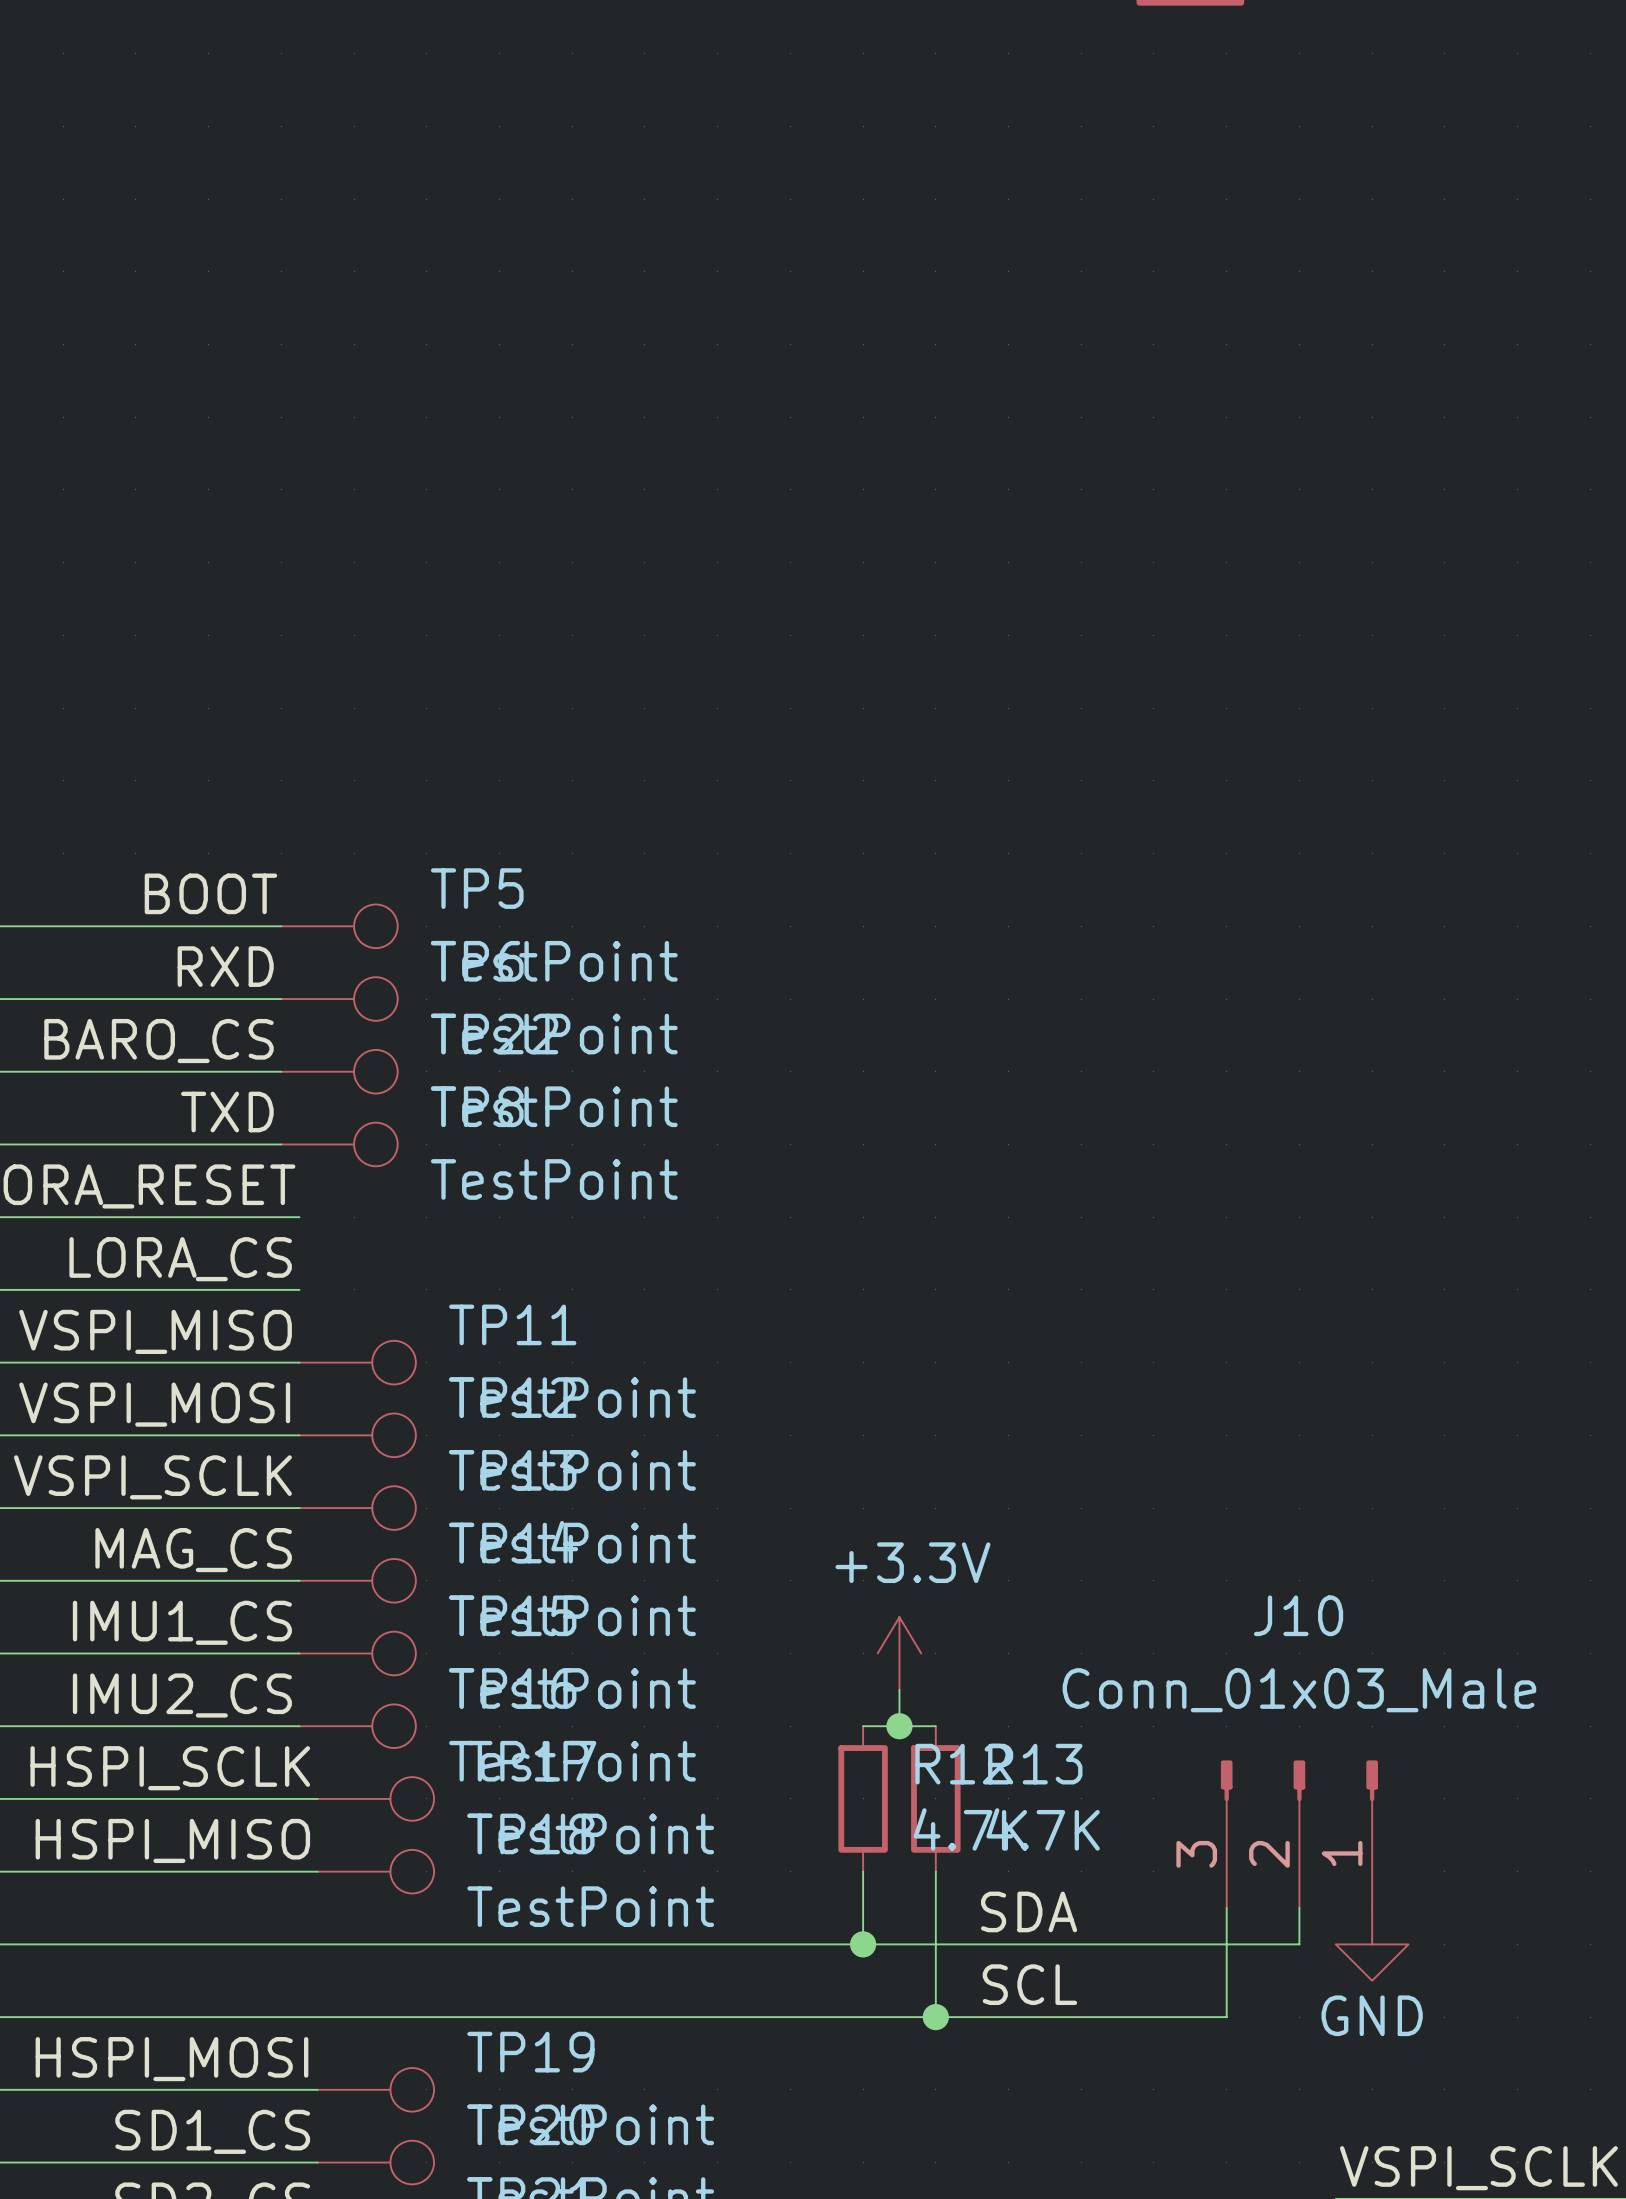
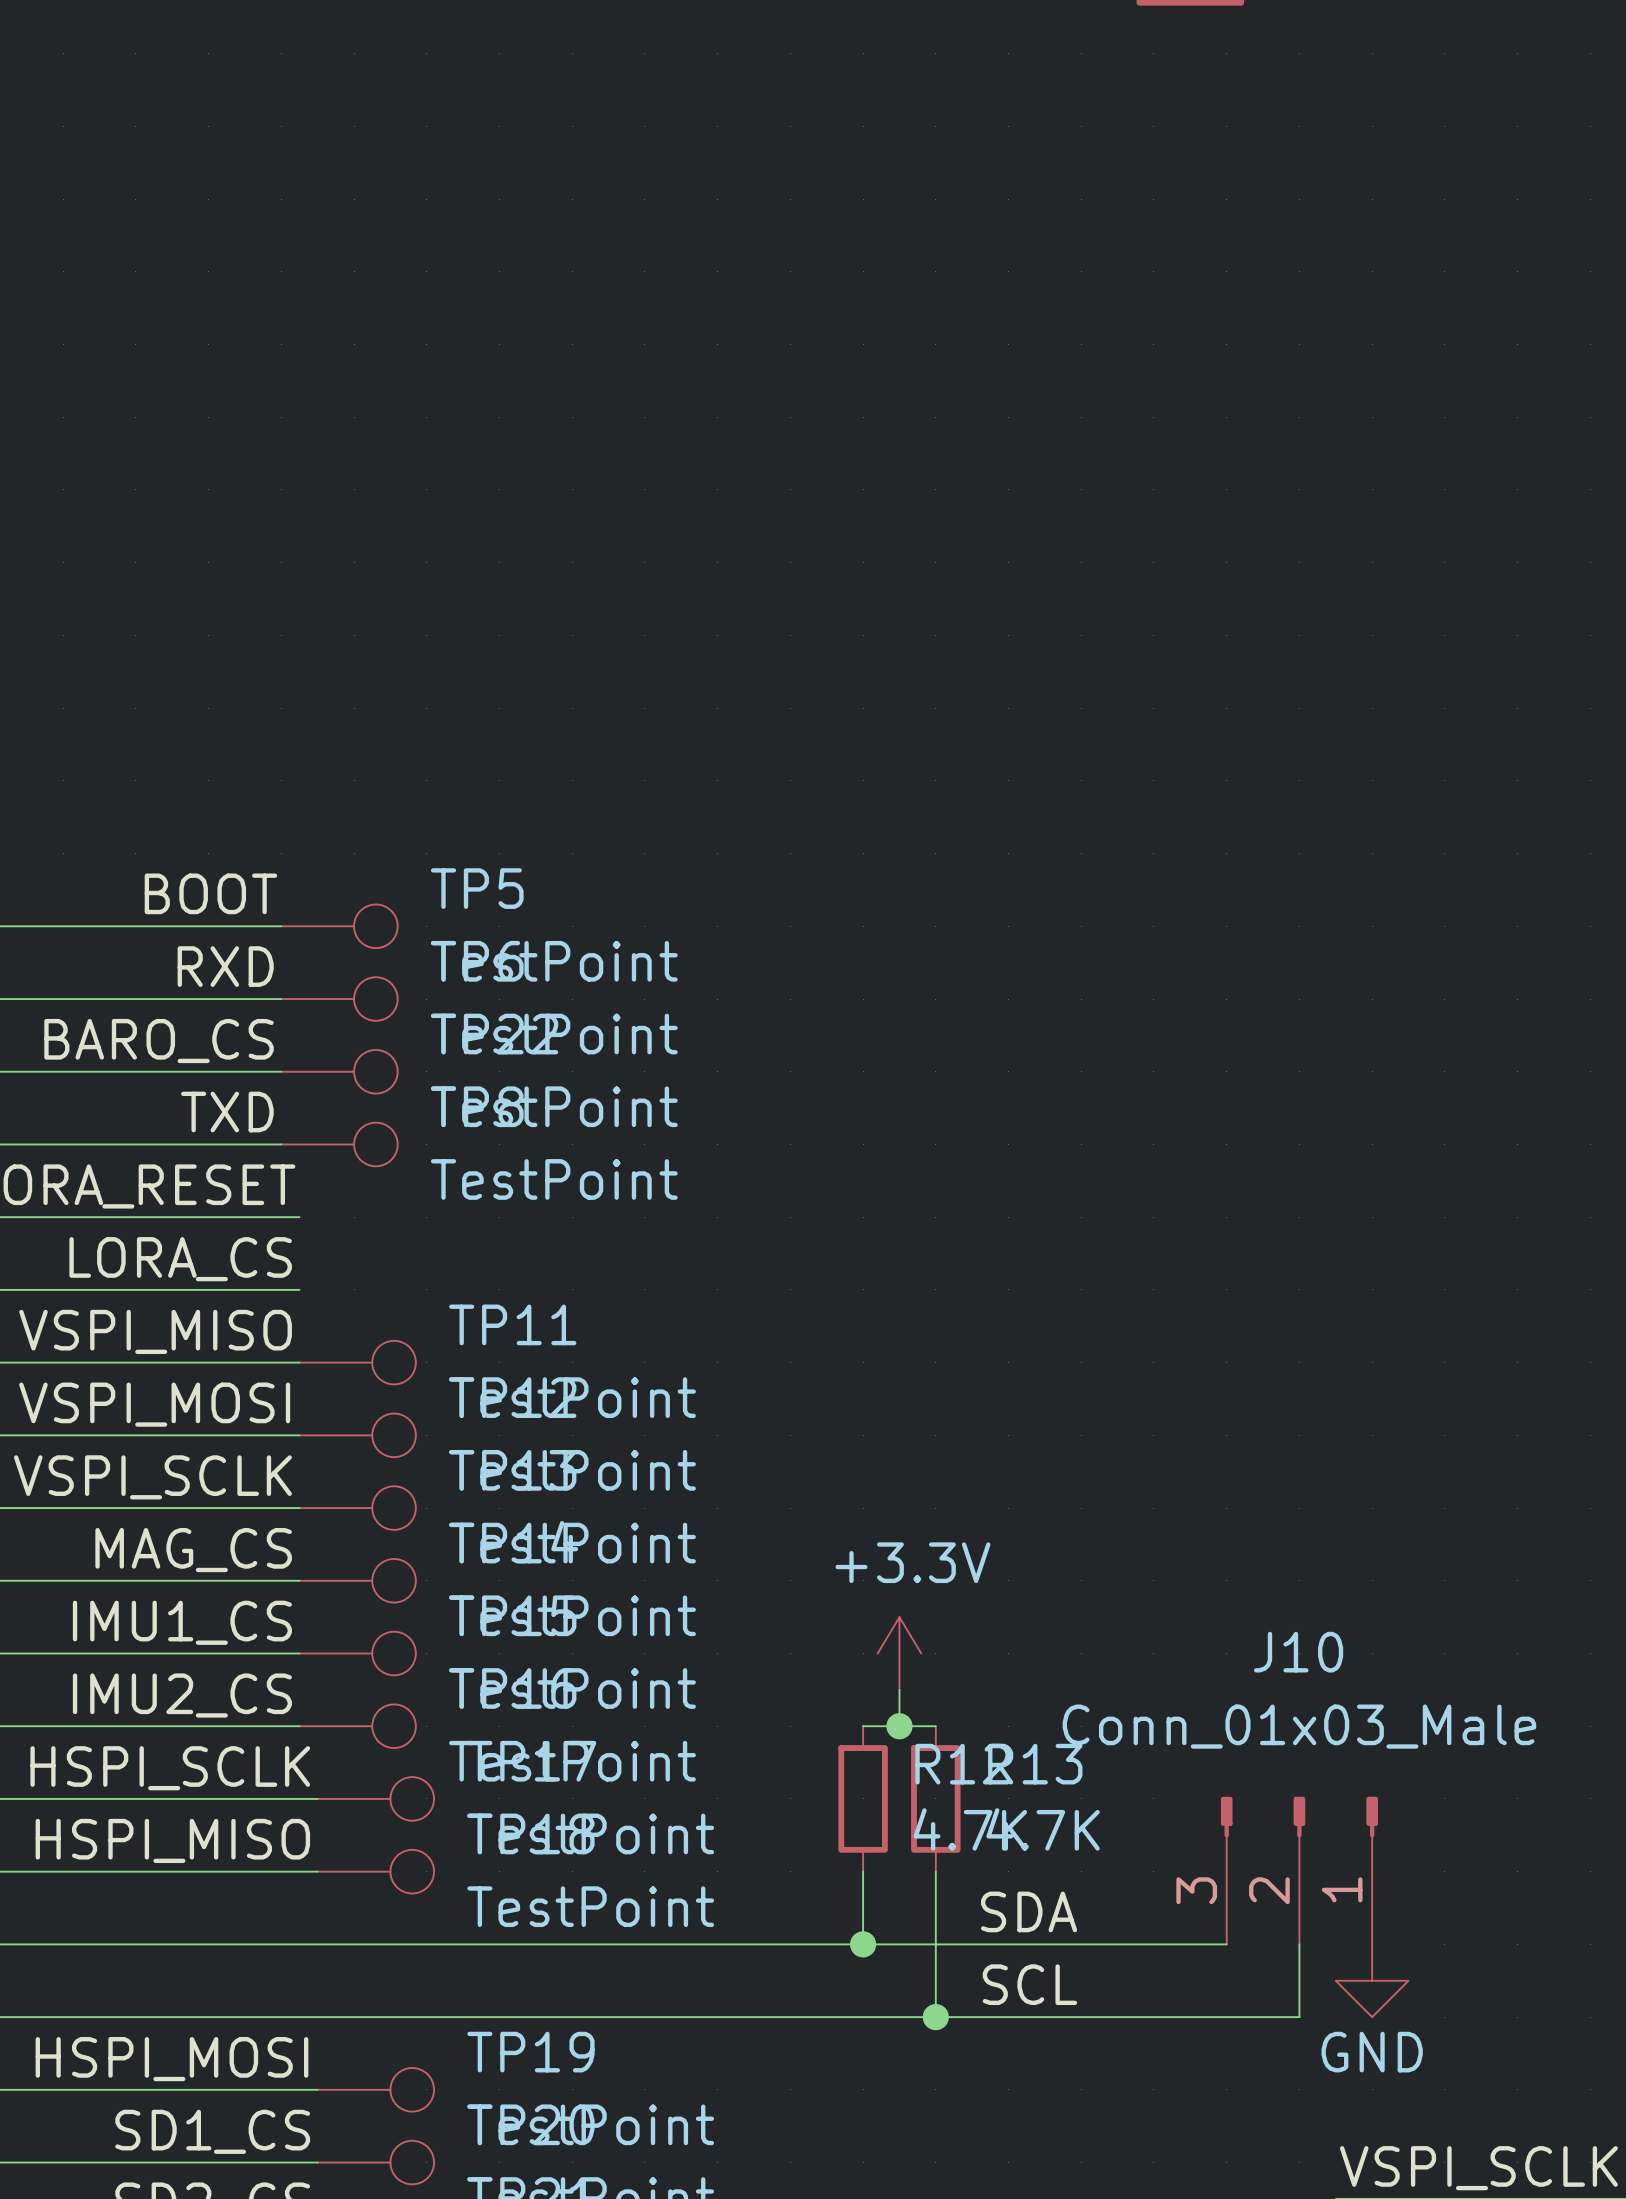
J10 position: (1299, 1834) -> (1299, 1870)
wire: (1226, 1908) (1226, 2017) -> (1299, 1944) (1299, 2017) (1226, 2017)
wire: (1299, 1908) (1299, 1944) (1226, 1944) -> none
power symbol position: GND (1372, 1944) -> GND (1372, 1980)

